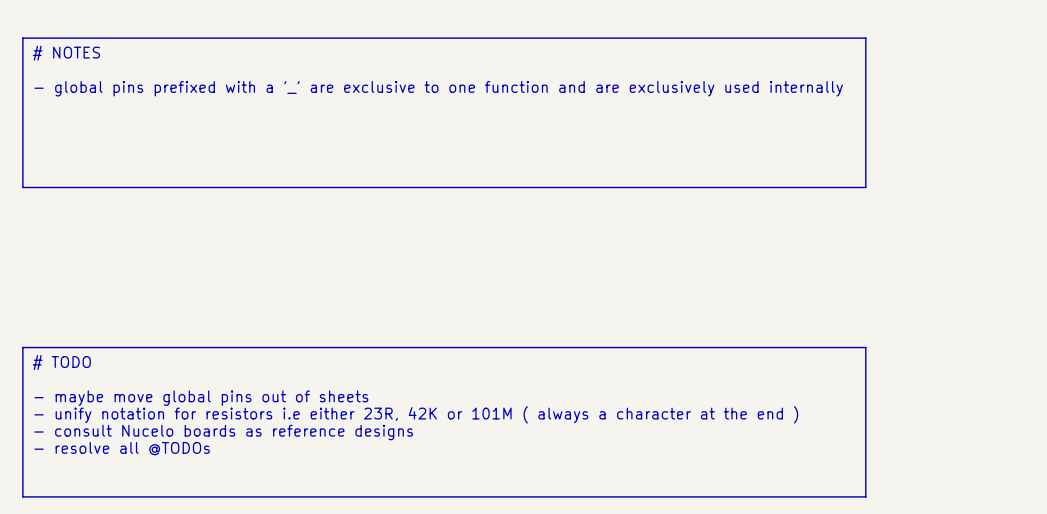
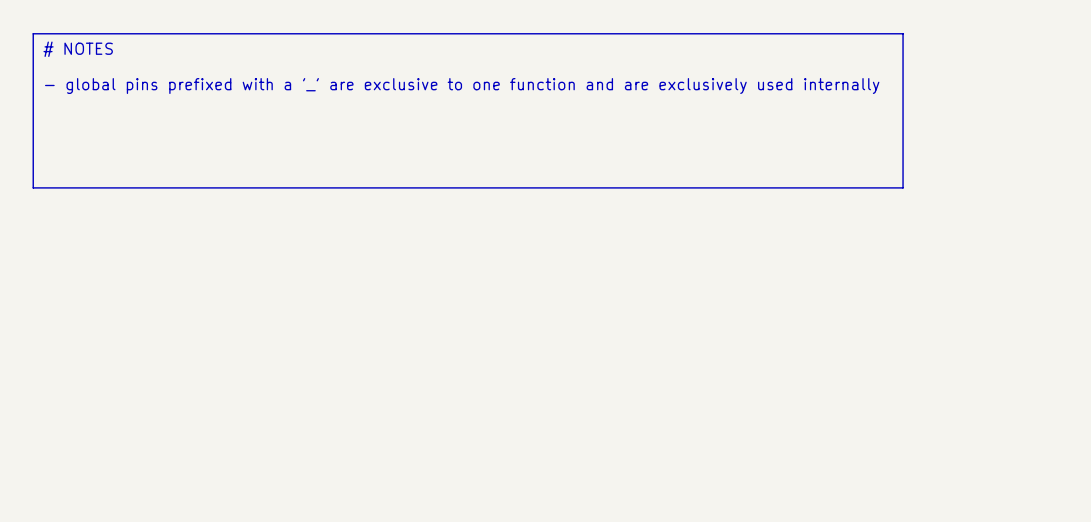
line: (22, 347) (865, 347) (865, 496) (22, 496) (22, 347) -> none
text: # TODO (61, 362) -> none
text: - maybe move global pins out of sheets (201, 398) -> none
text: - unify notation for resistors i.e either 23R, 42K or 101M ( always a character at the end ) (416, 414) -> none
text: - consult Nucelo boards as reference designs (223, 432) -> none
text: - resolve all @TODOs (122, 448) -> none

